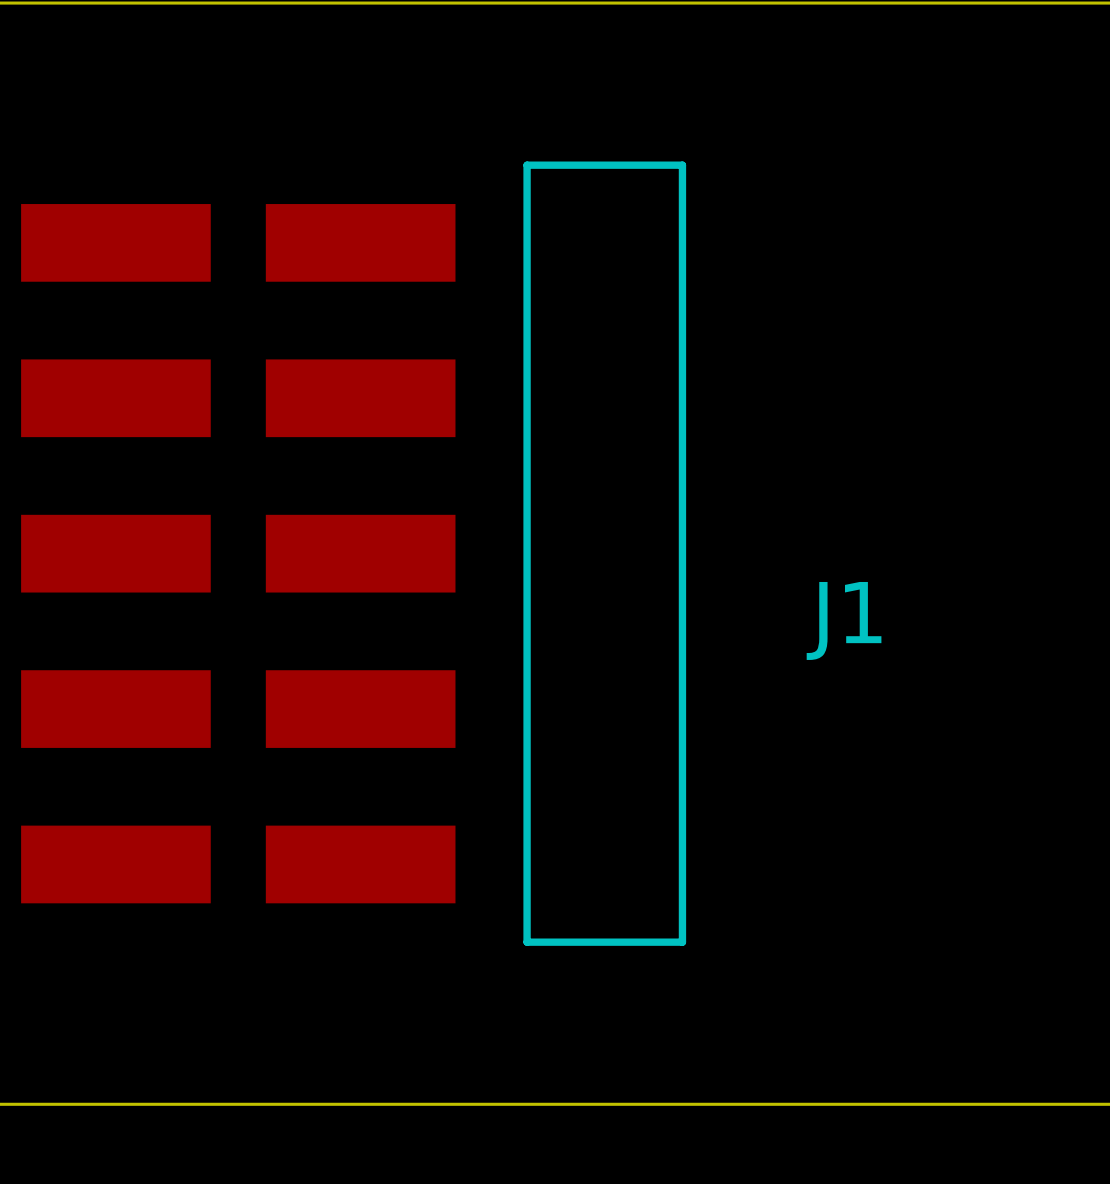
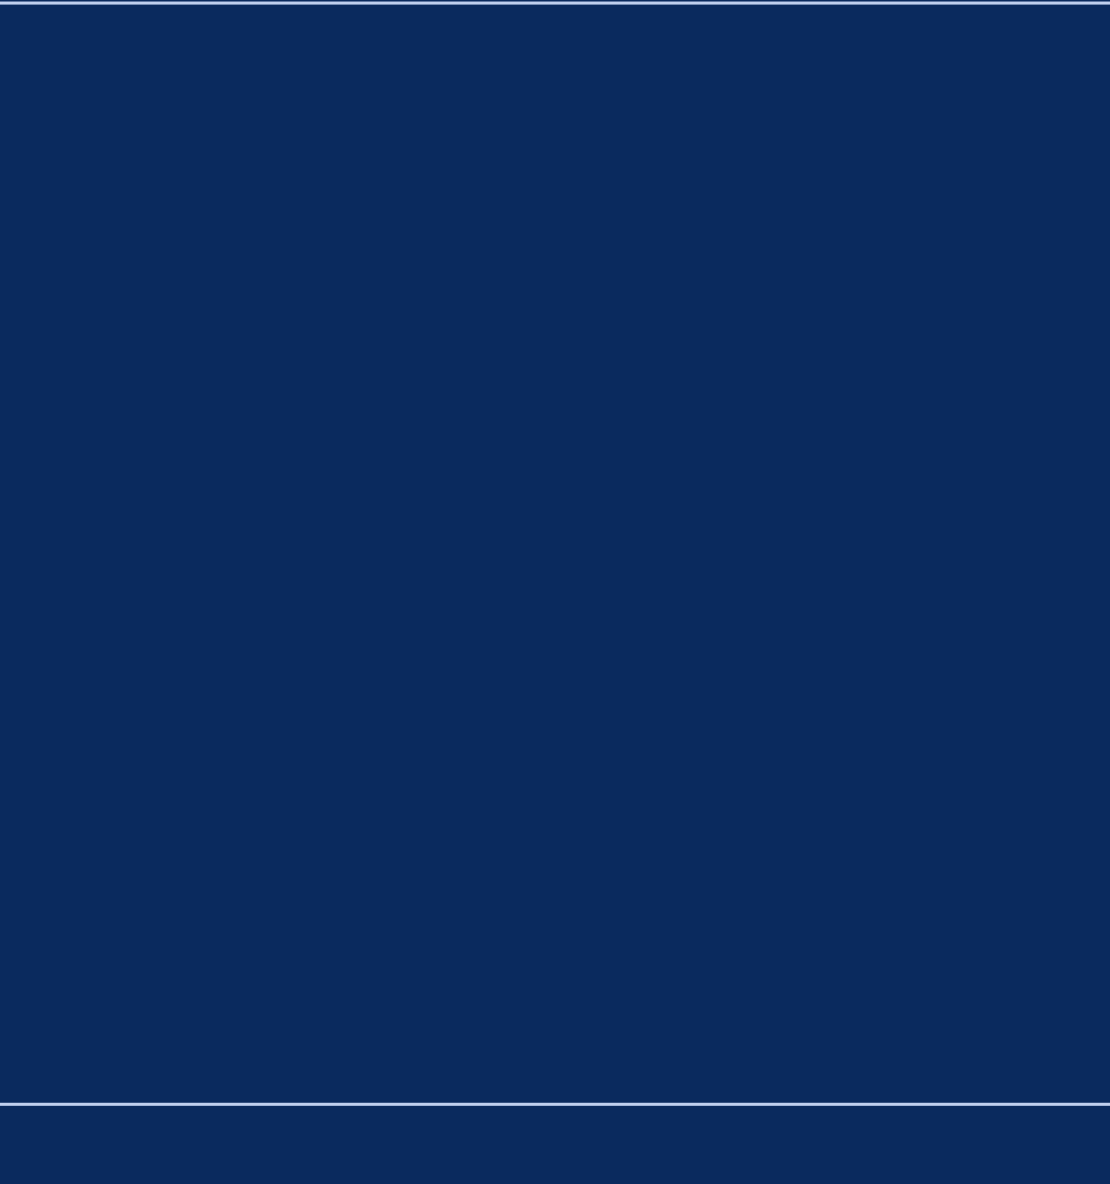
J1: (353, 553) -> none

